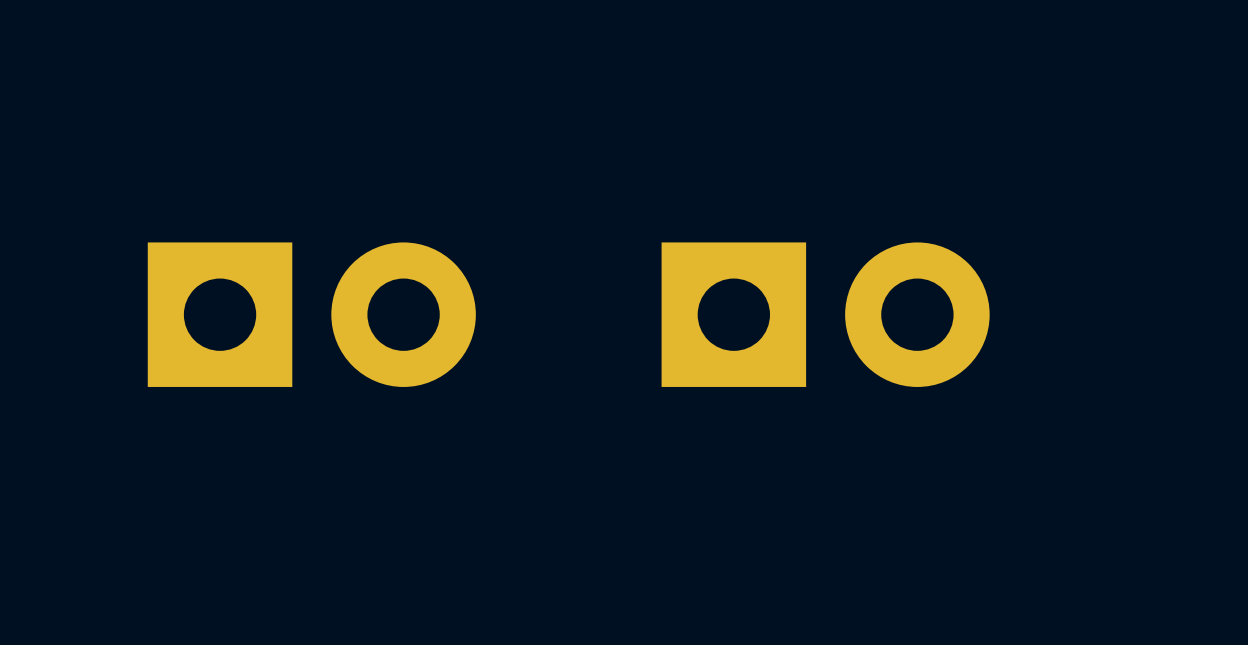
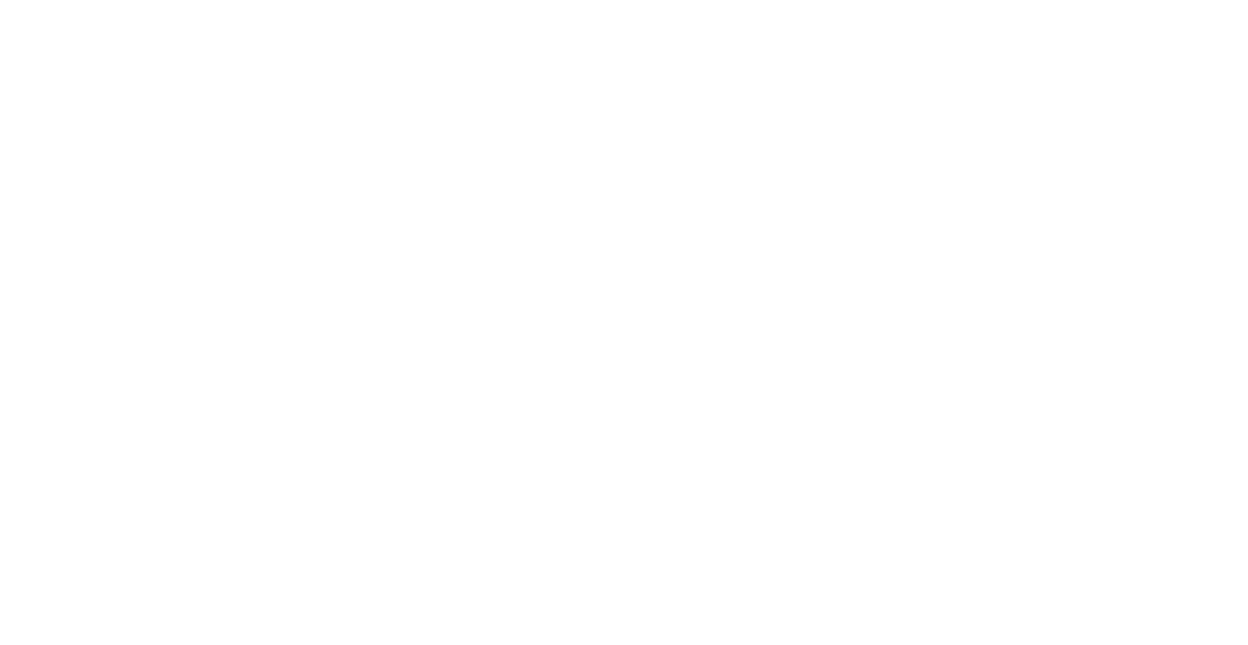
part: (311, 314) -> none
part: (825, 314) -> none

